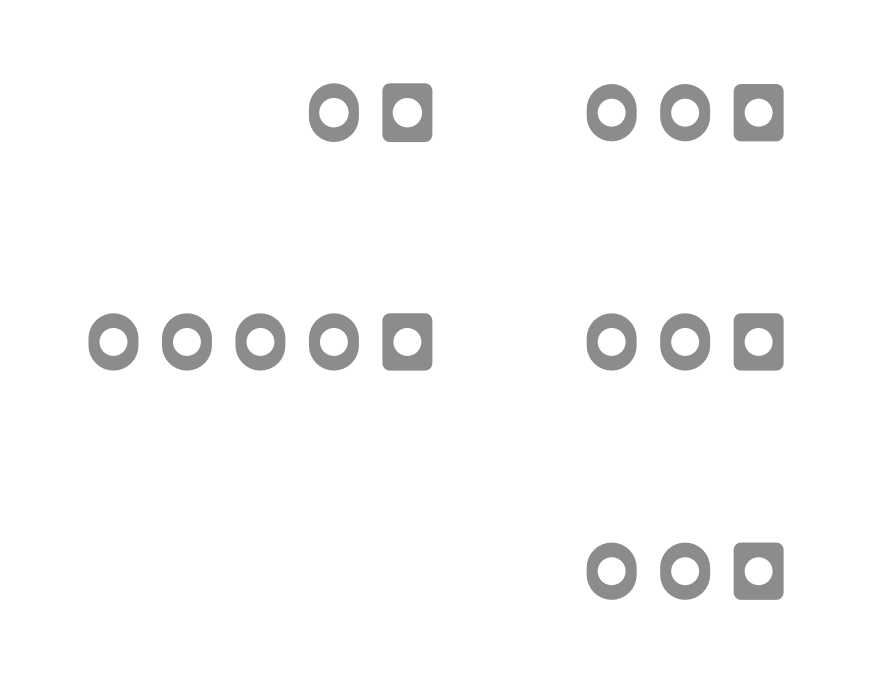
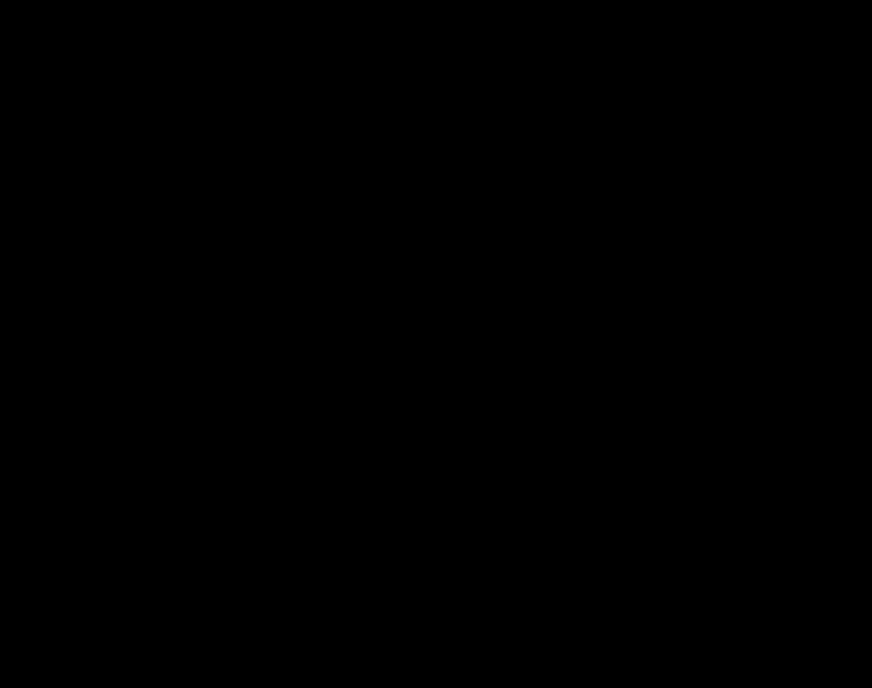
part: (370, 112) -> none
part: (685, 112) -> none
part: (260, 341) -> none
part: (685, 341) -> none
part: (685, 571) -> none

